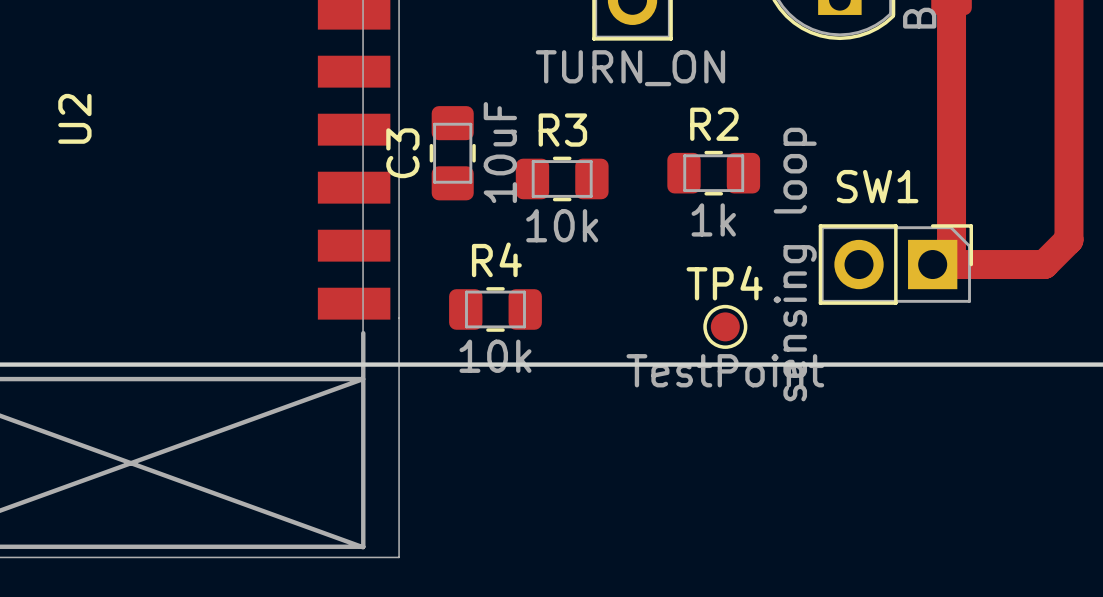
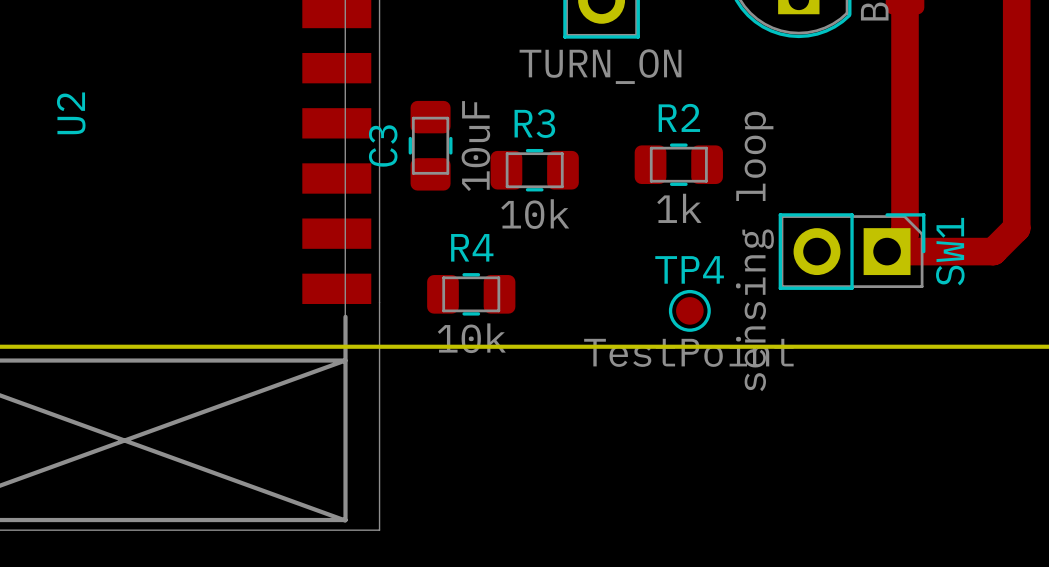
SW1 name rotation: 0° (877, 186) -> 90° counterclockwise (950, 251)
SW1 name position: SW1 (877, 186) -> SW1 (950, 251)

